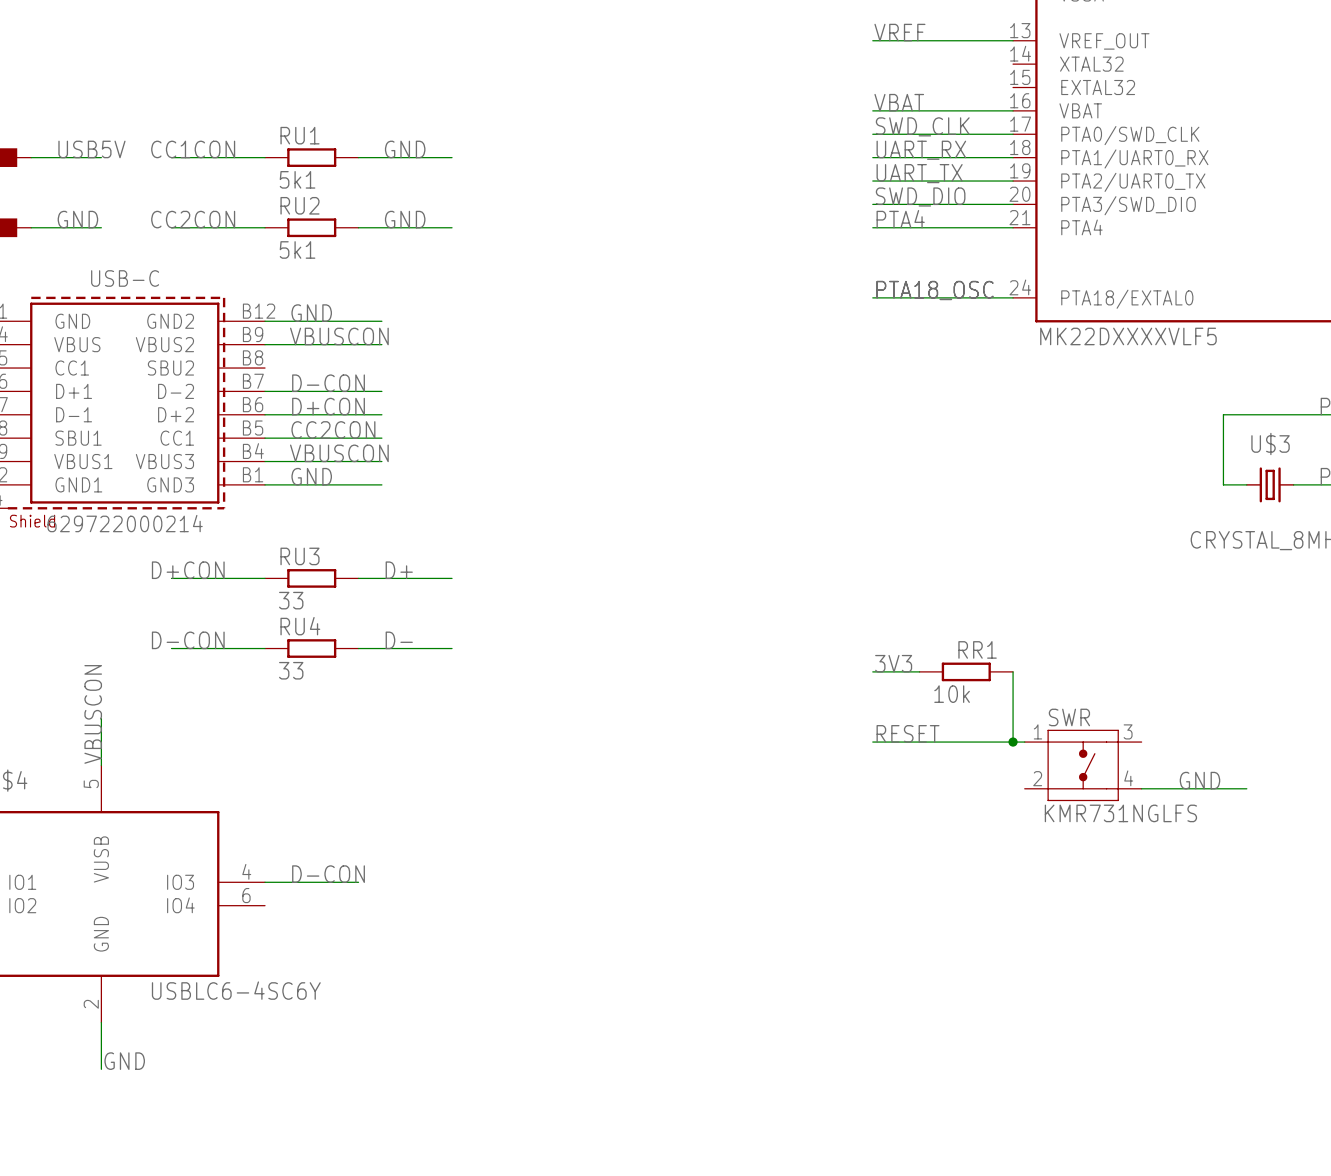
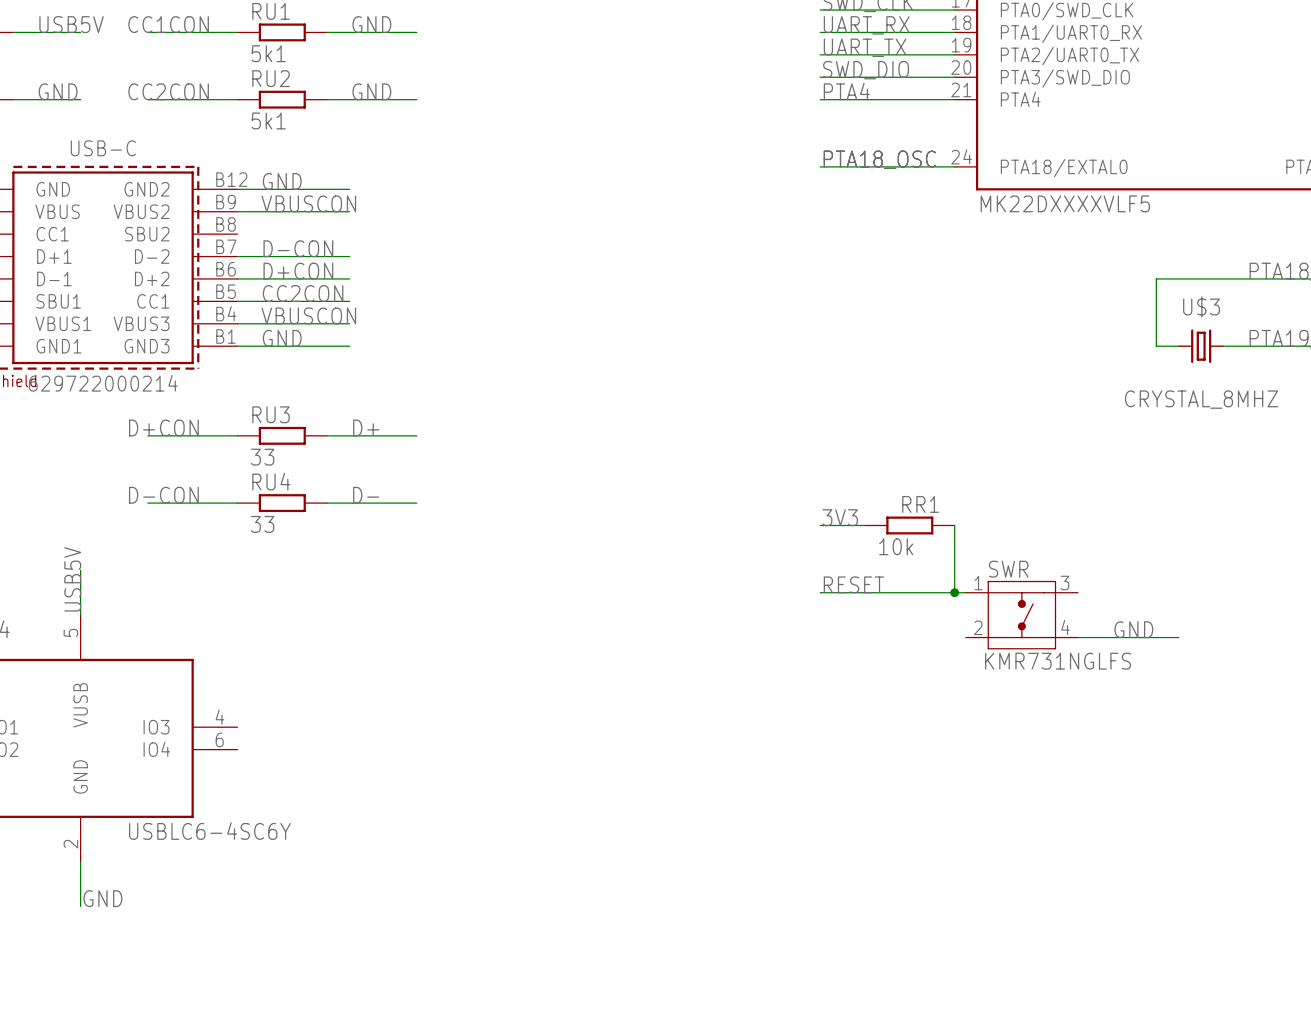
label: VBUSCON (93, 714) -> USB5V (72, 579)
label: D-CON (328, 874) -> none
wire: (265, 882) (358, 882) -> none

